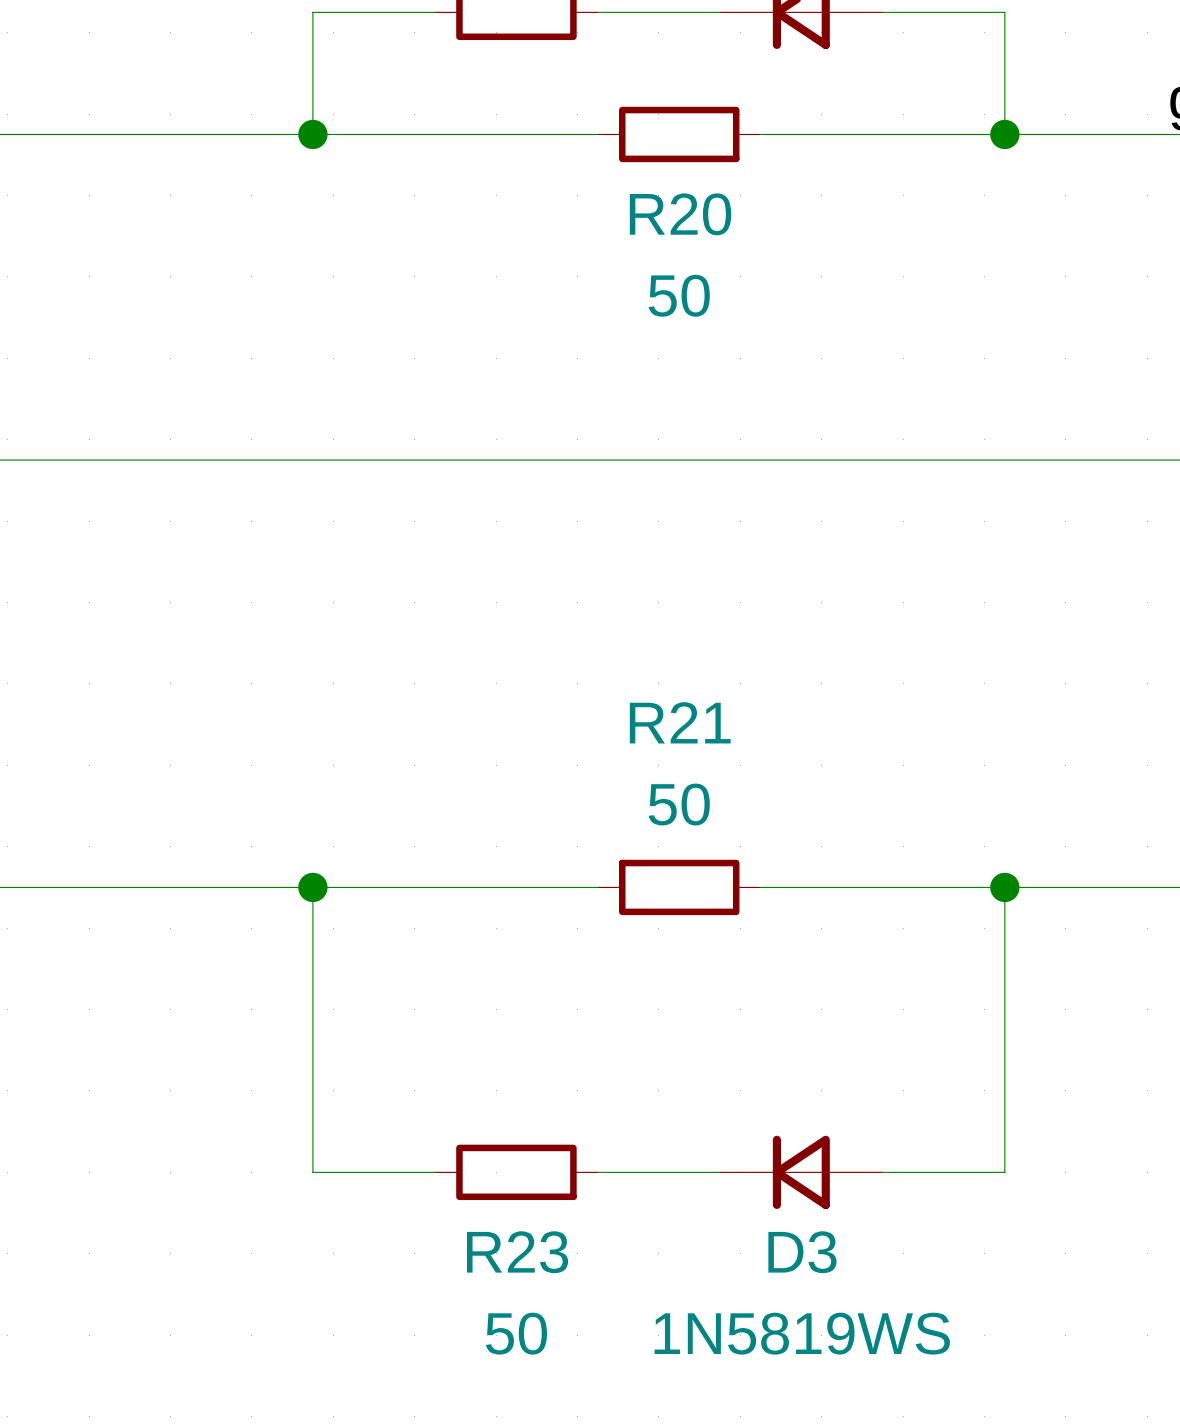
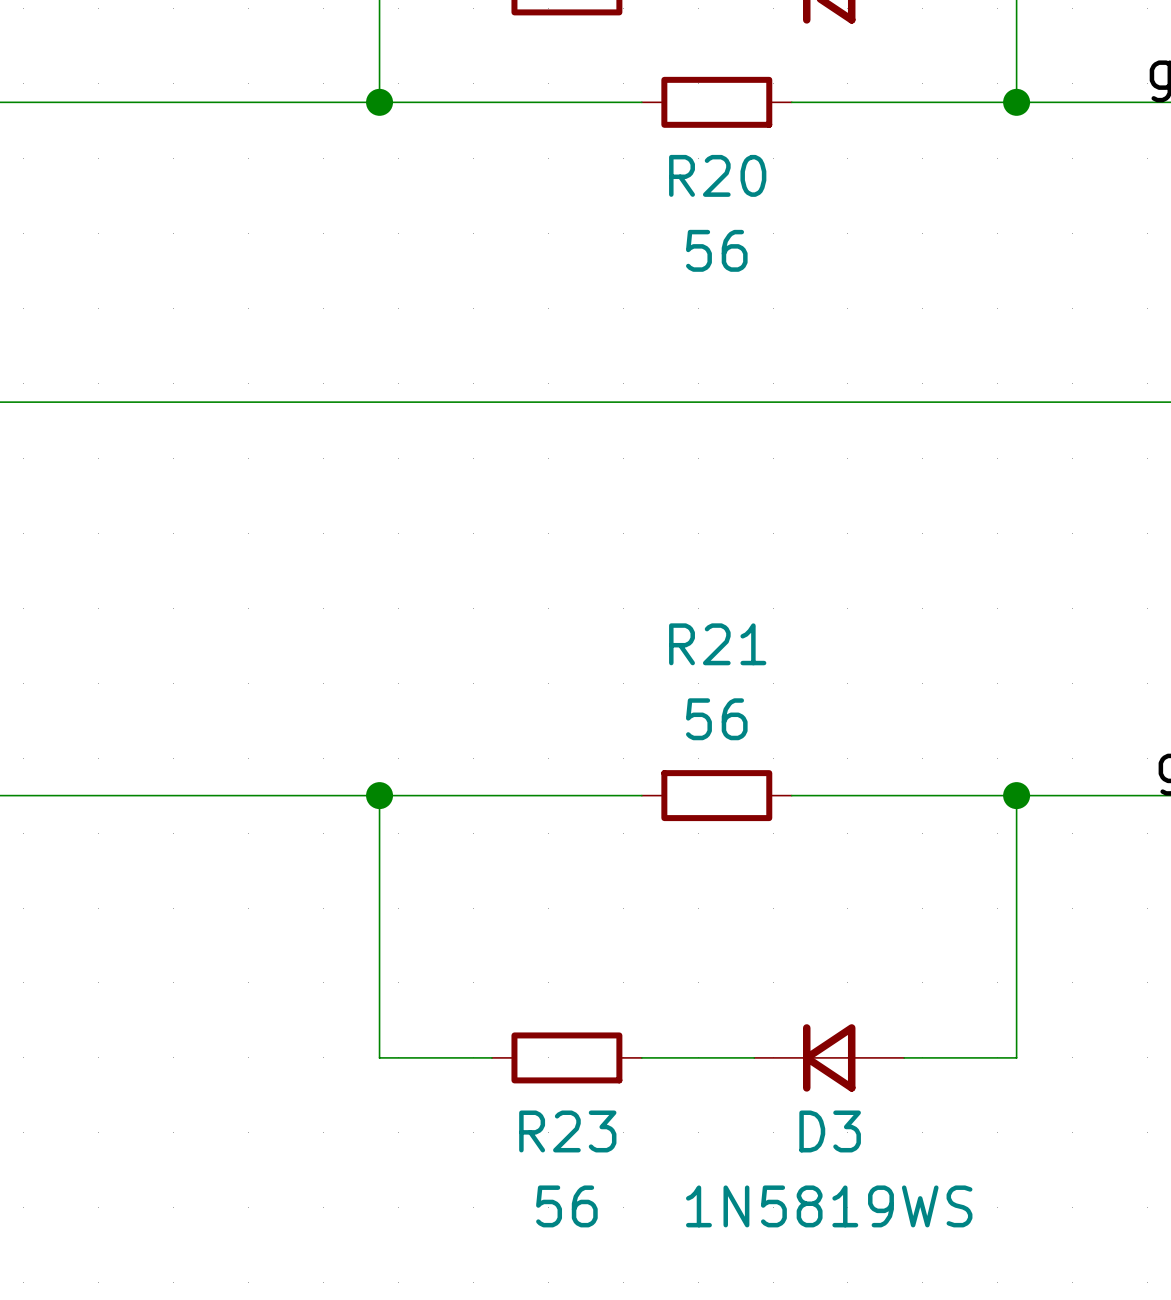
R20 value: 50 (679, 295) -> 56 (716, 250)
R21 value: 50 (679, 804) -> 56 (716, 719)
R23 value: 50 (516, 1333) -> 56 (566, 1206)

